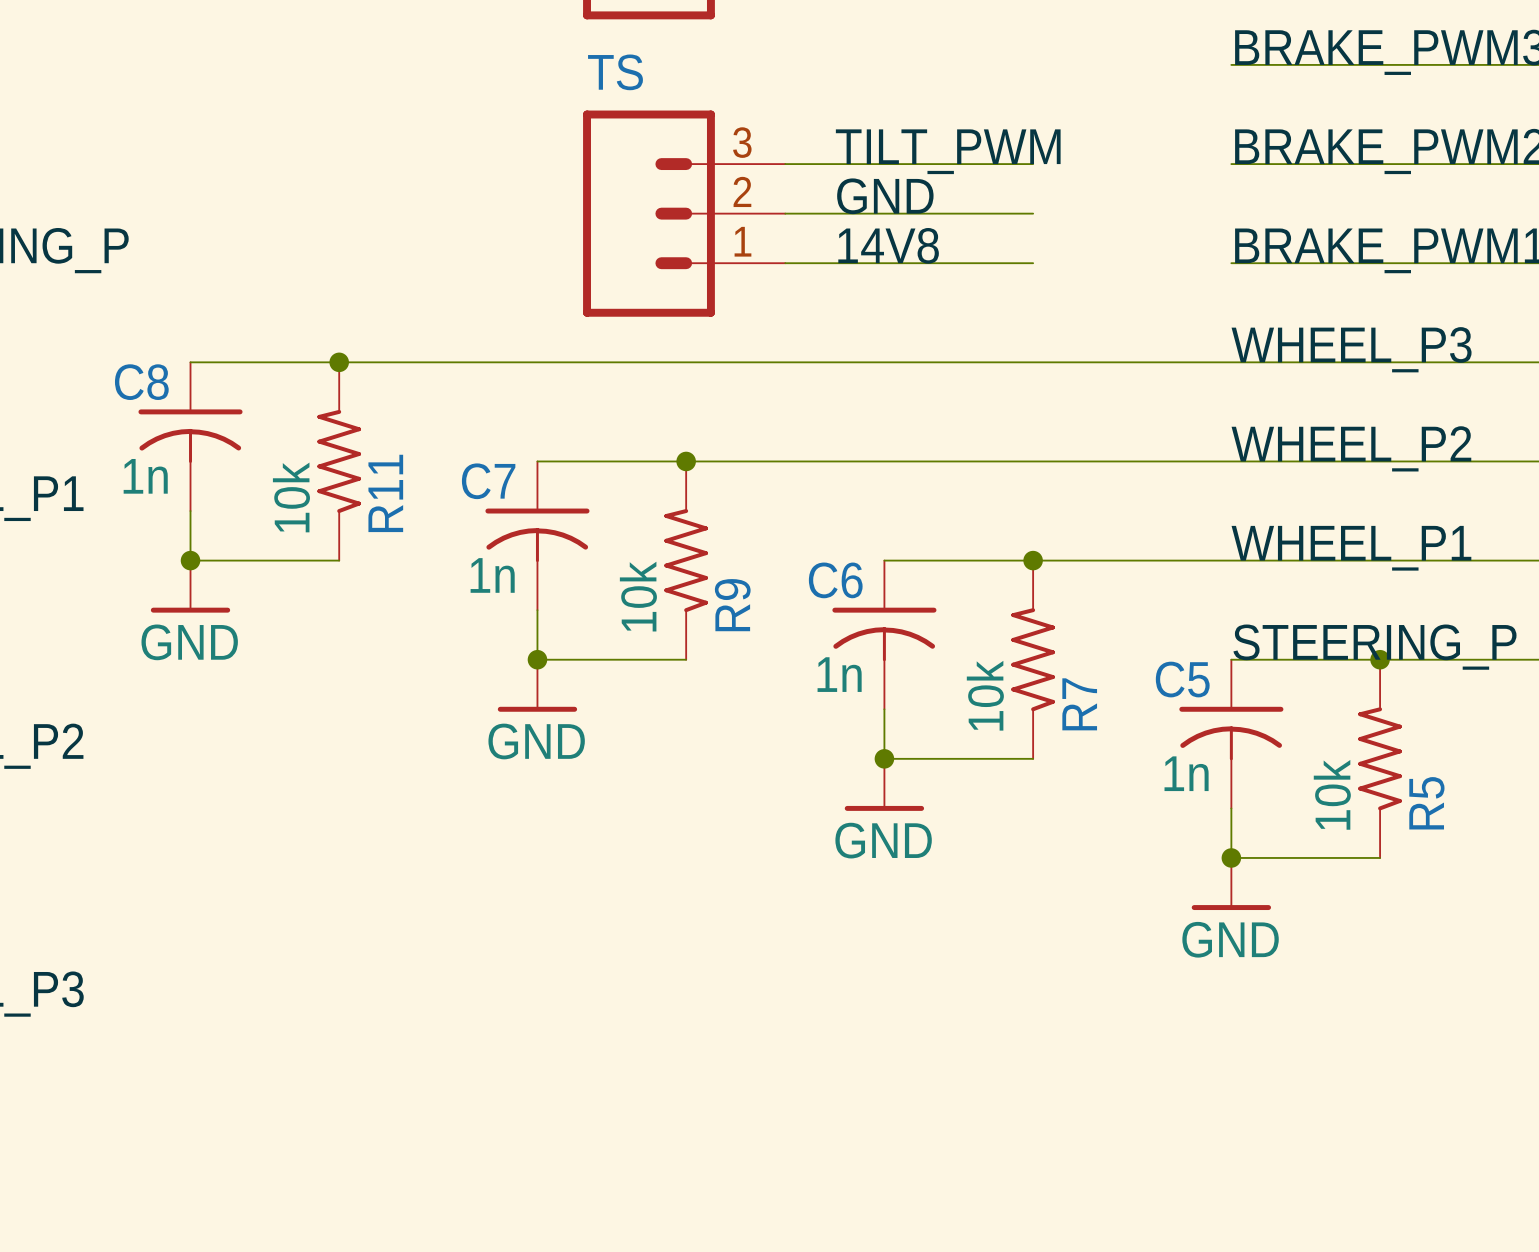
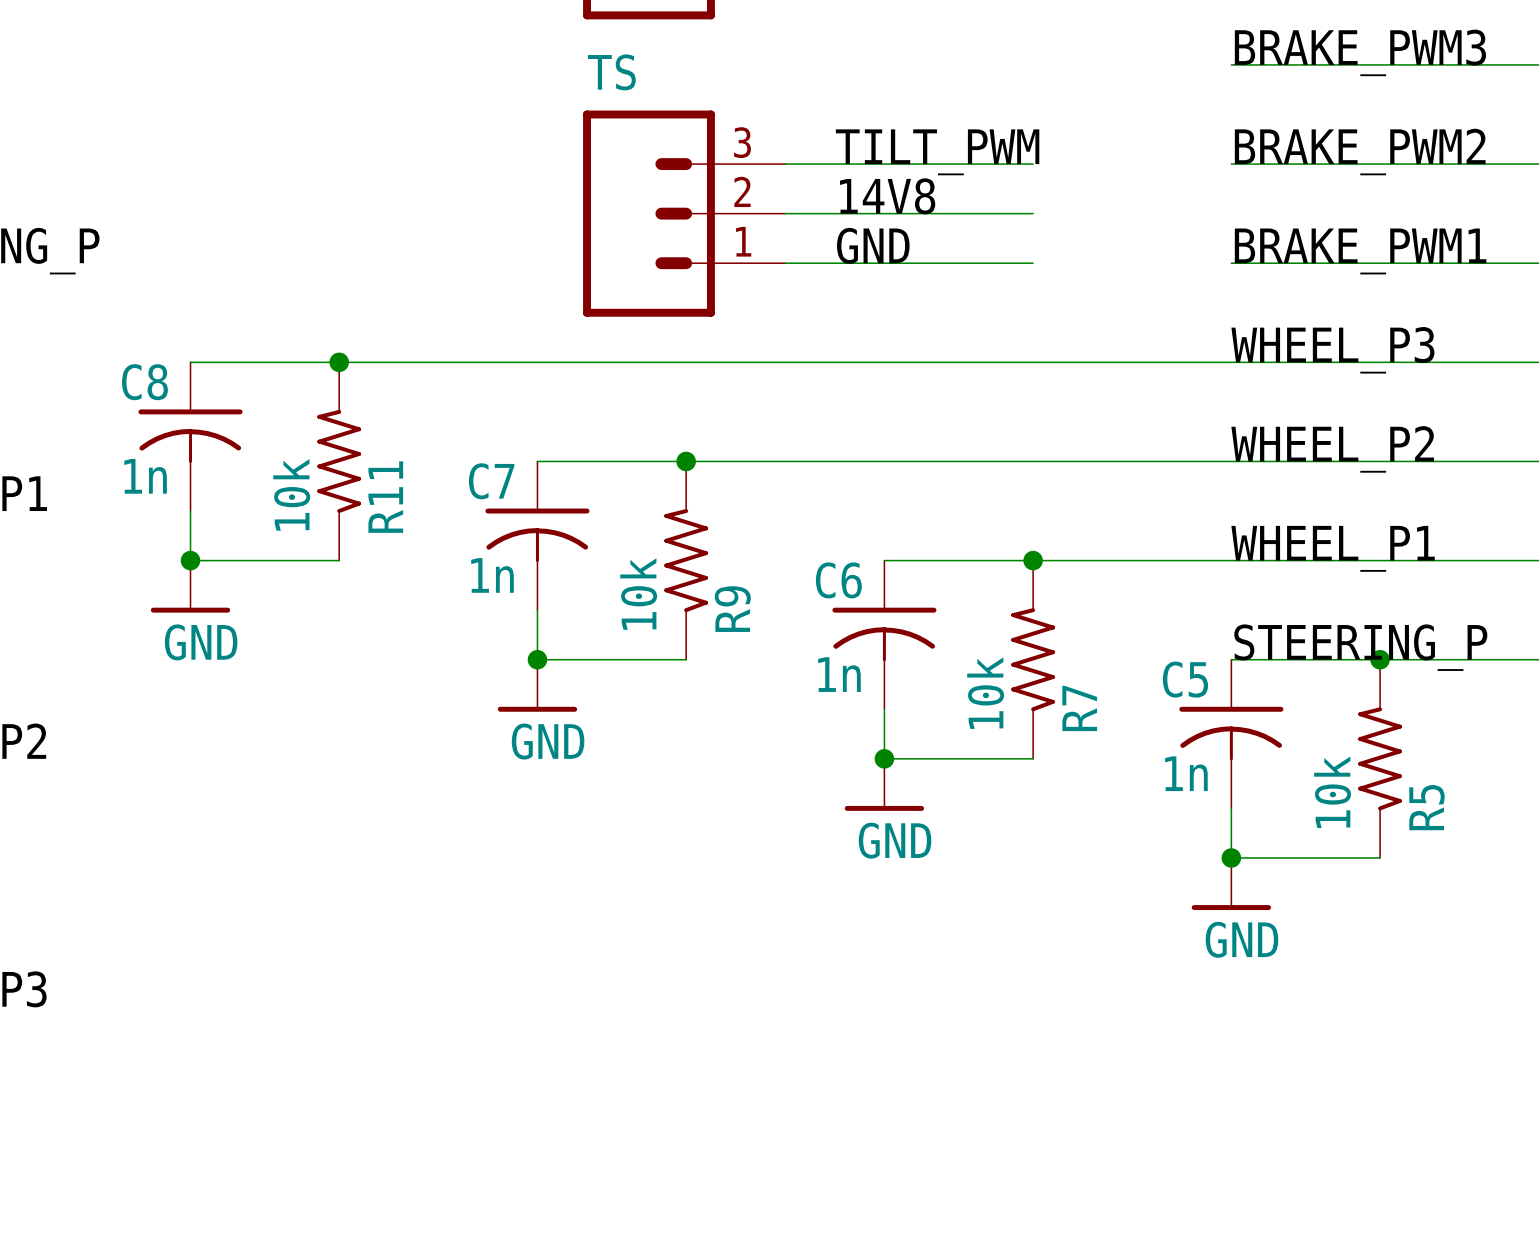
label: GND (885, 196) -> 14V8 (887, 196)
label: 14V8 (888, 245) -> GND (873, 245)

